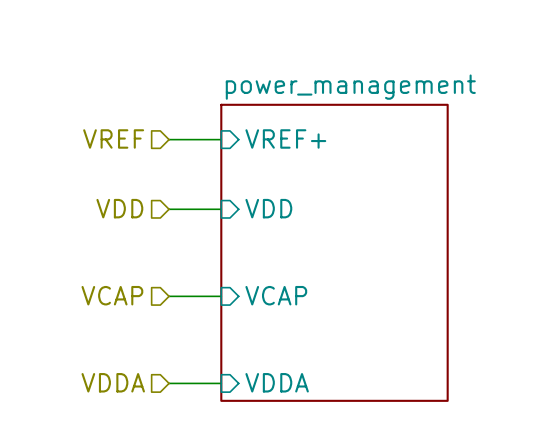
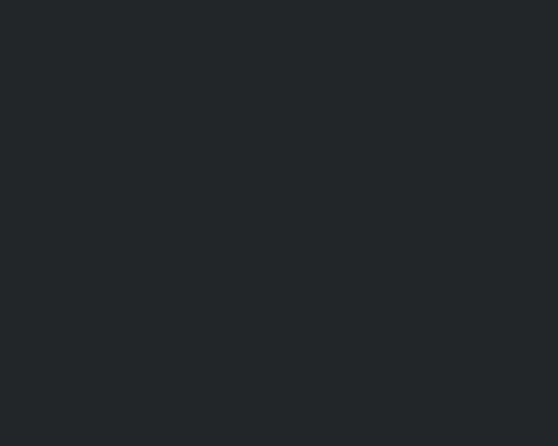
hierarchical label: VREF (113, 138) -> none
sheet pin: VREF+ (285, 138) -> none
wire: (169, 139) (221, 139) -> none
hierarchical label: VDD (119, 208) -> none
sheet pin: VDD (268, 208) -> none
wire: (169, 209) (221, 209) -> none
sheet power_management: (334, 252) -> none
hierarchical label: VCAP (112, 295) -> none
sheet pin: VCAP (276, 295) -> none
wire: (169, 296) (221, 296) -> none
hierarchical label: VDDA (113, 382) -> none
sheet pin: VDDA (277, 382) -> none
wire: (169, 383) (221, 383) -> none

